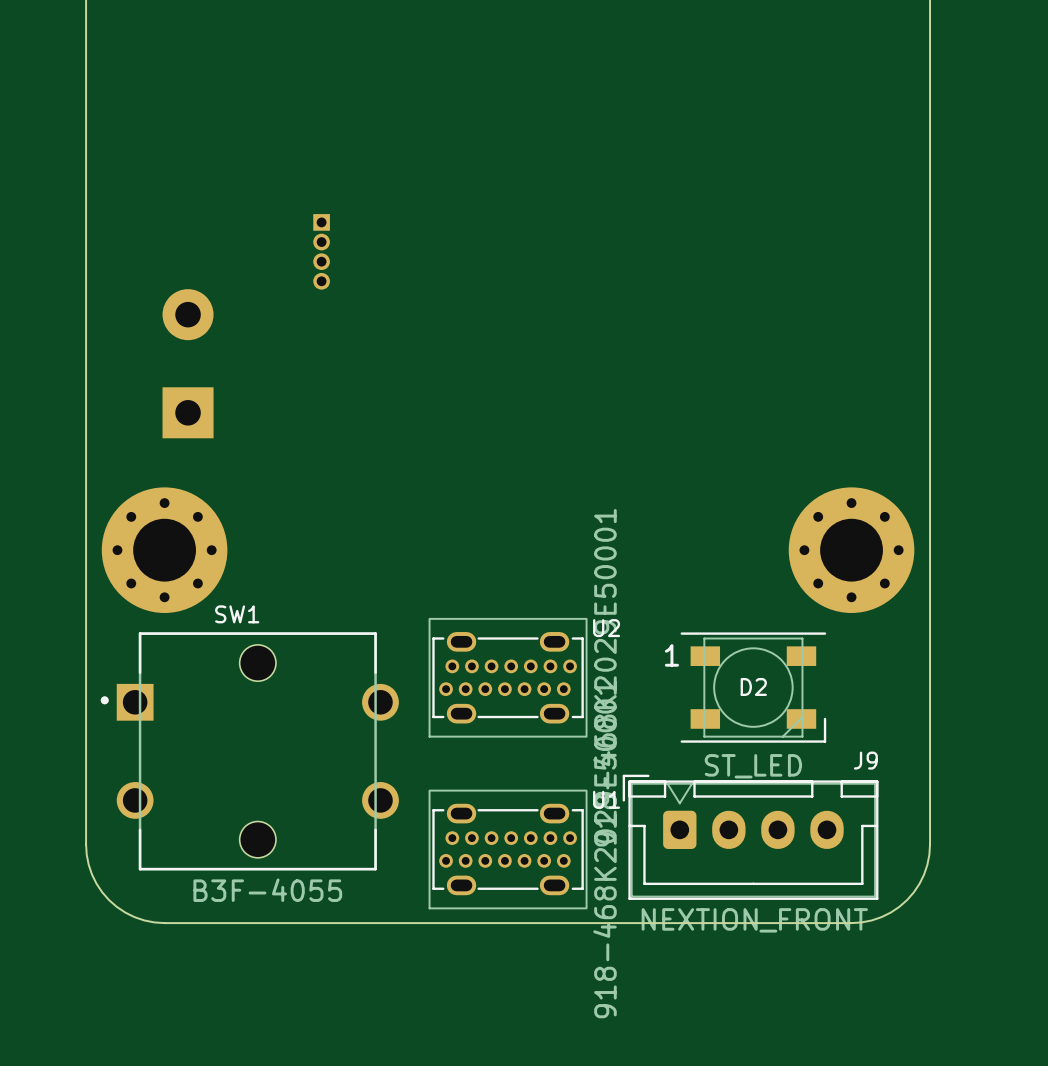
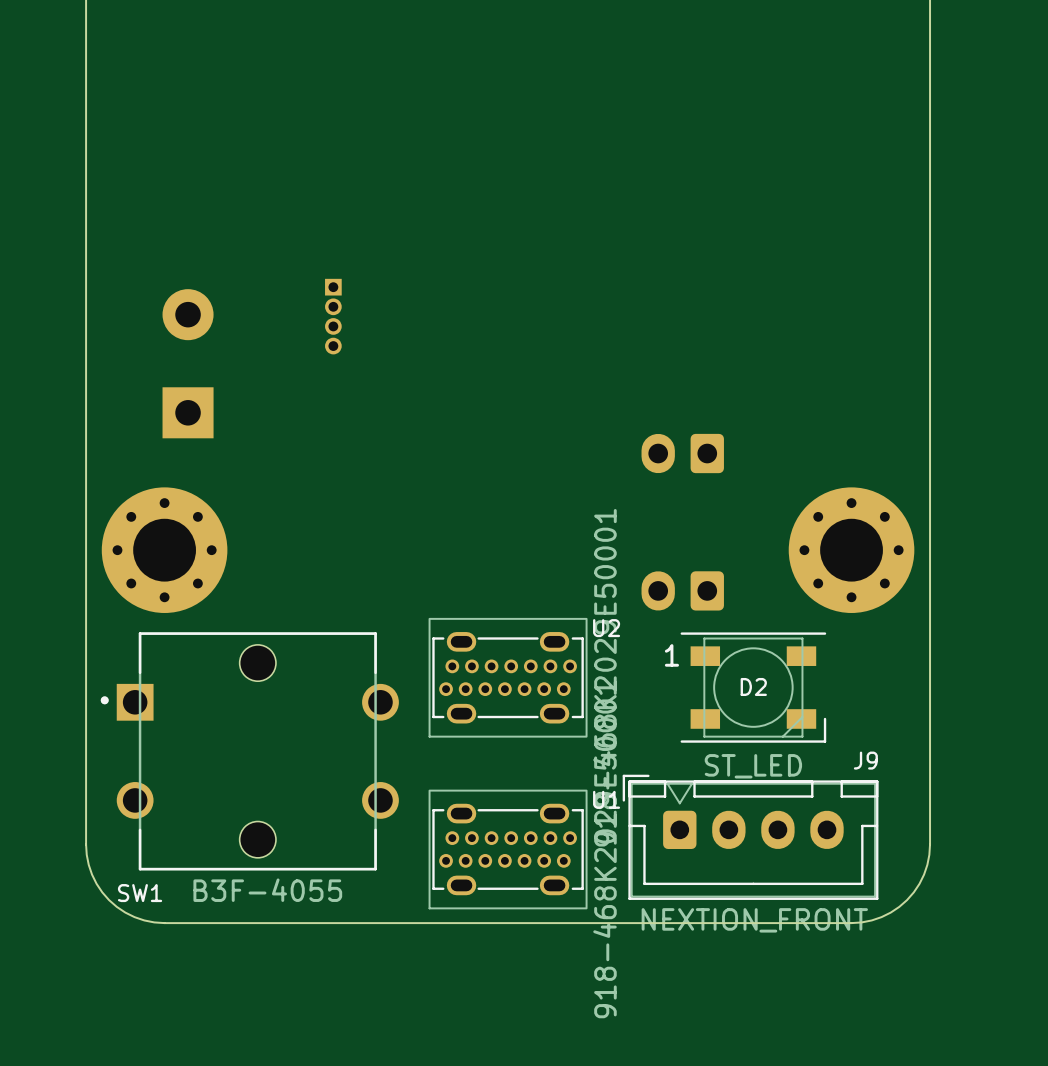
part position: (321, 251) -> (333, 316)
part: none -> (682, 453)
part: none -> (682, 590)
SW1 name position: SW1 (237, 614) -> SW1 (140, 893)

